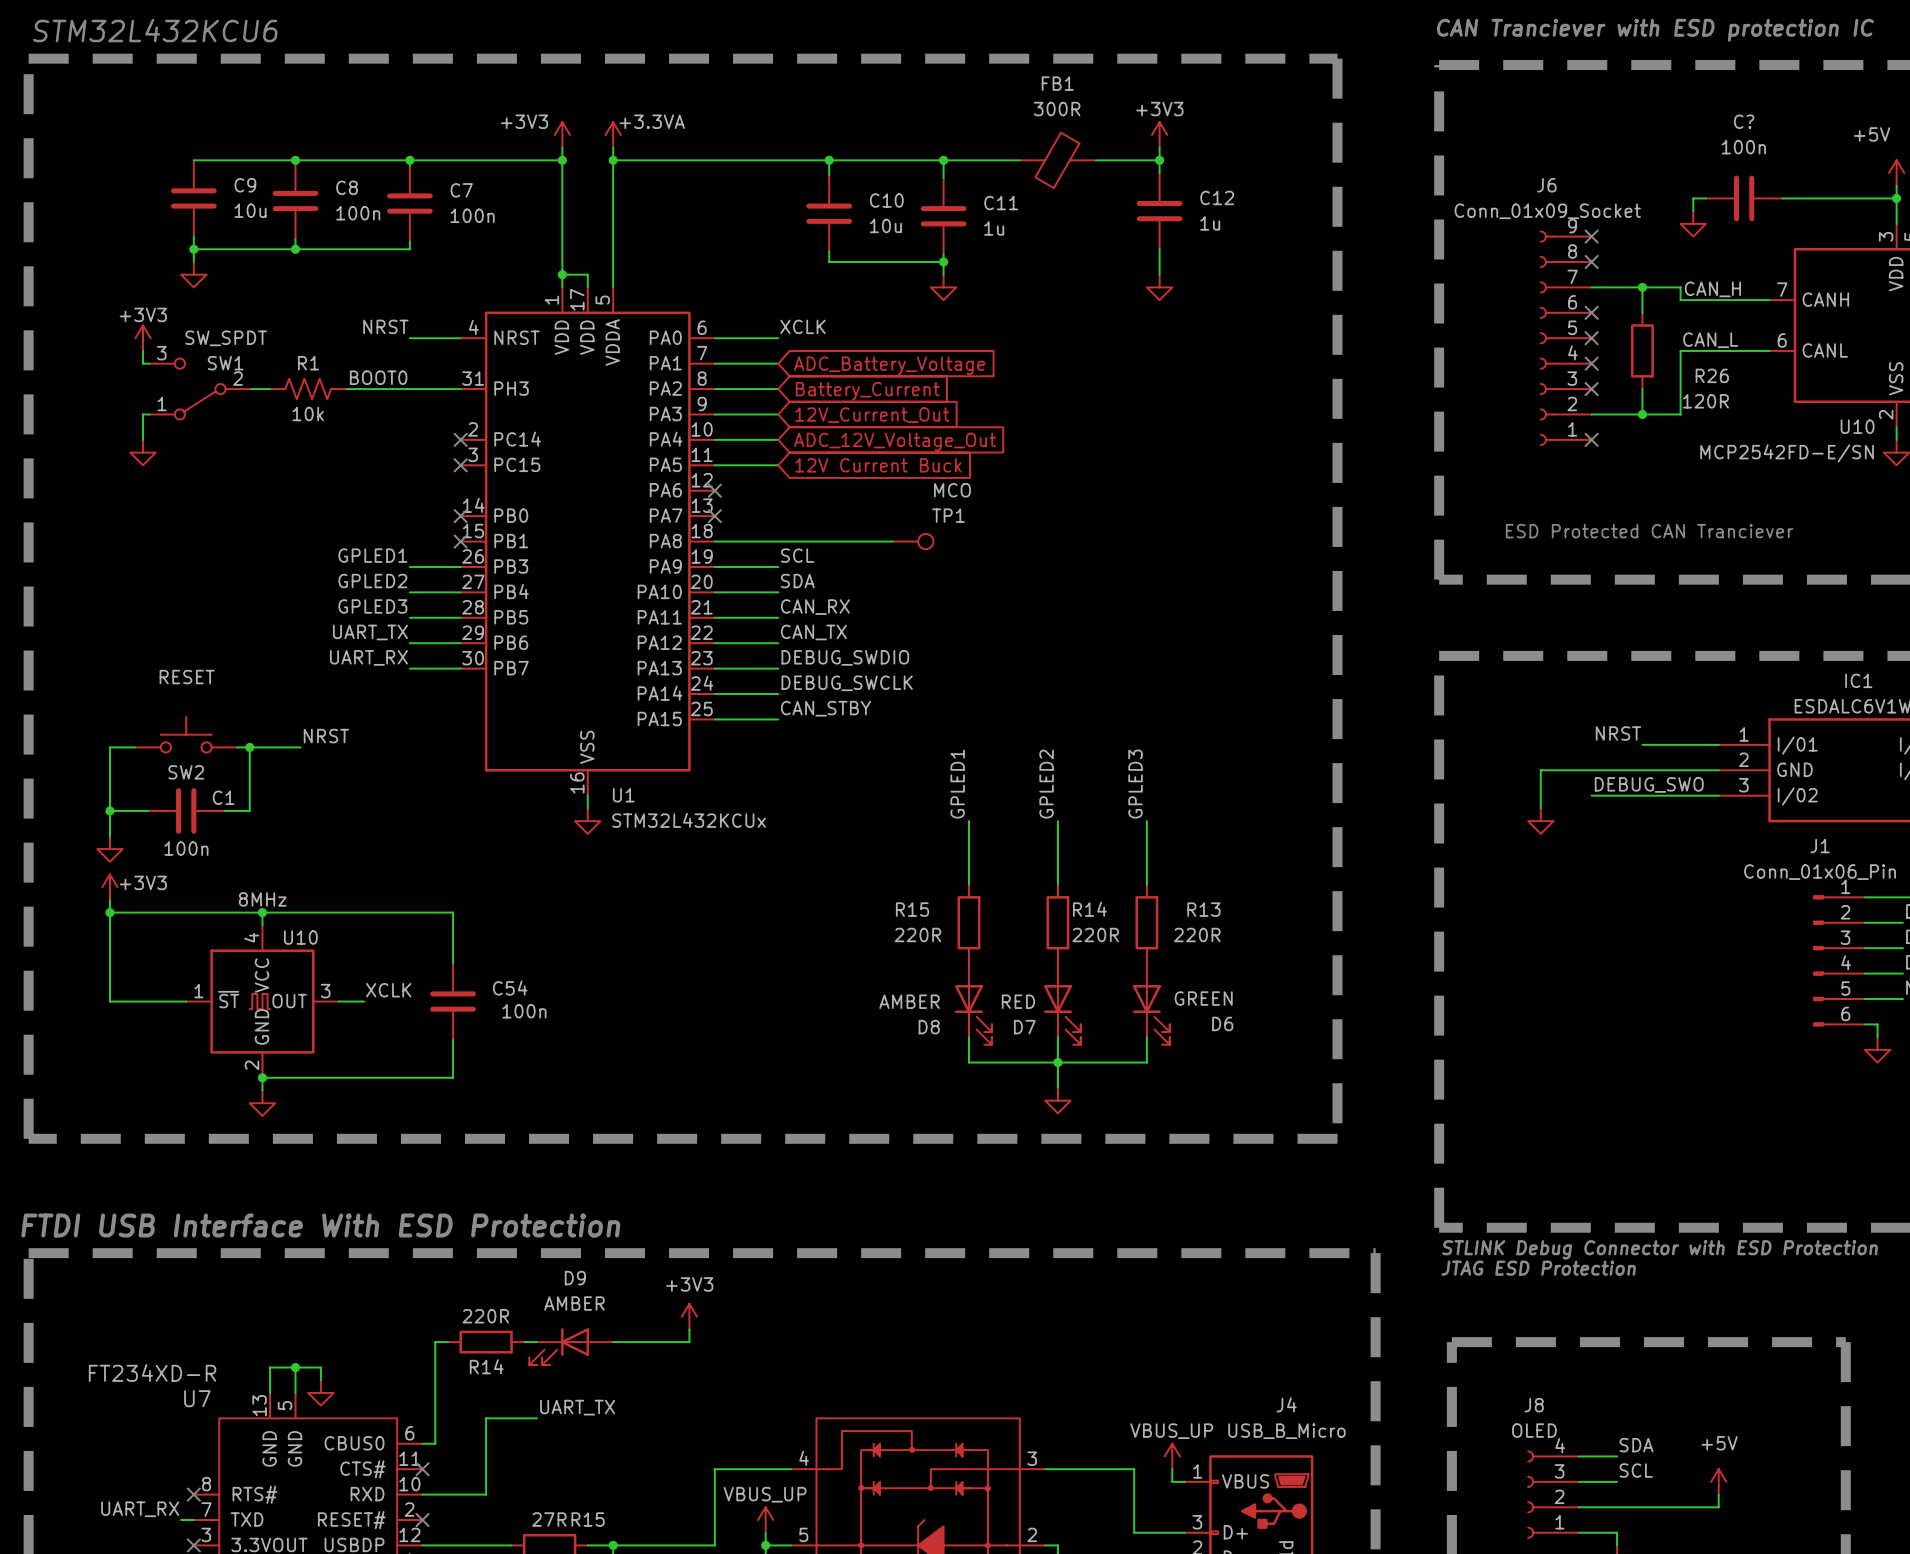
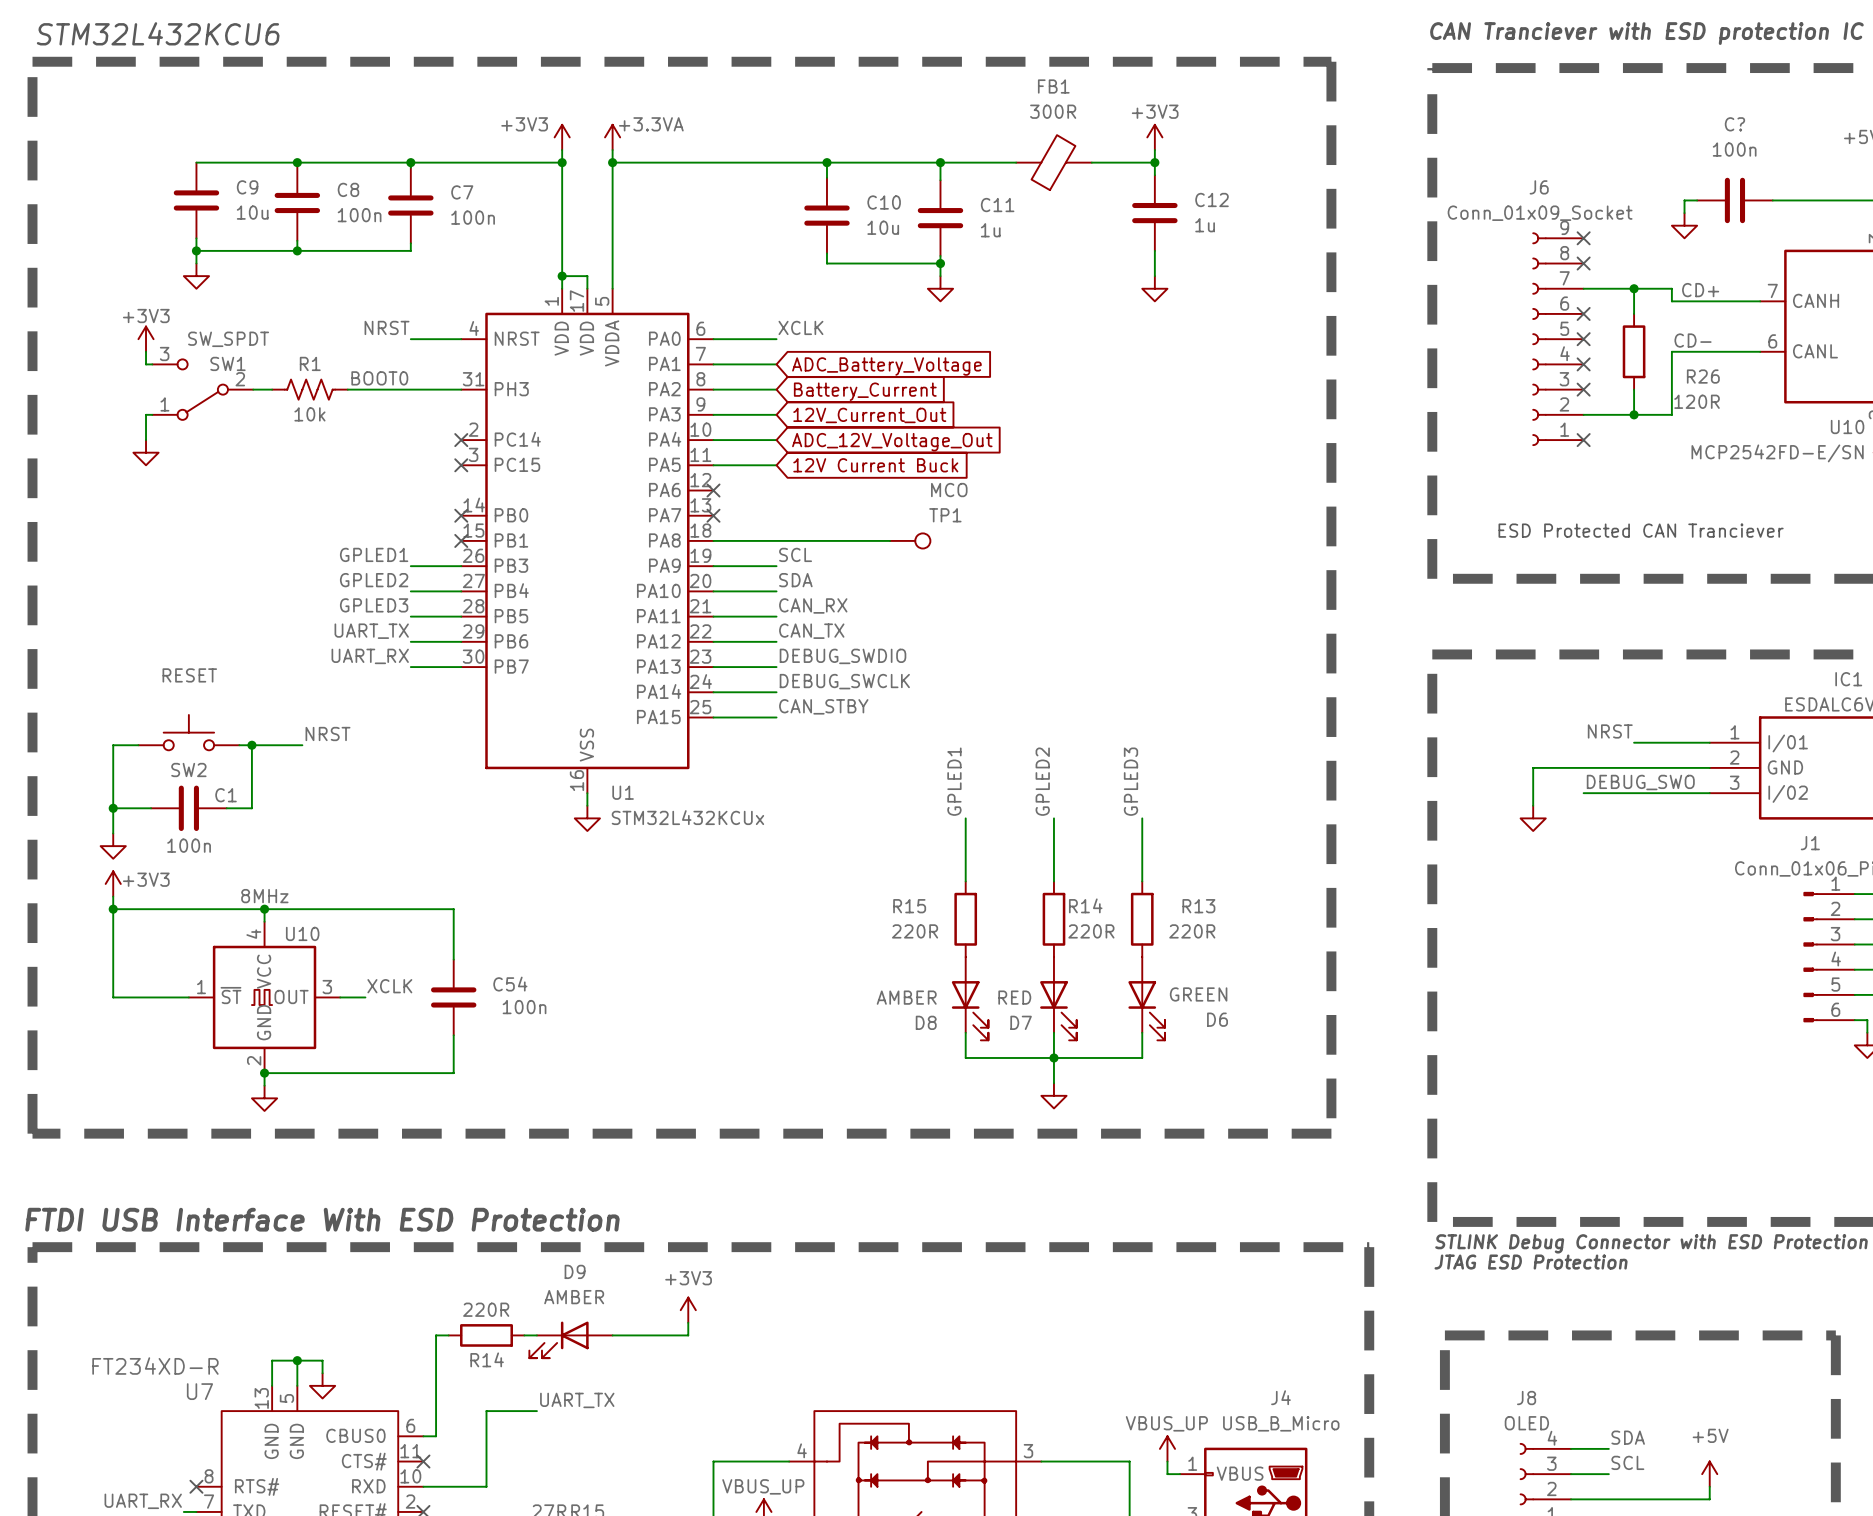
label: none -> CD+ (1700, 290)
label: CAN_H (1712, 289) -> none
label: CAN_L (1710, 340) -> CD- (1693, 340)

